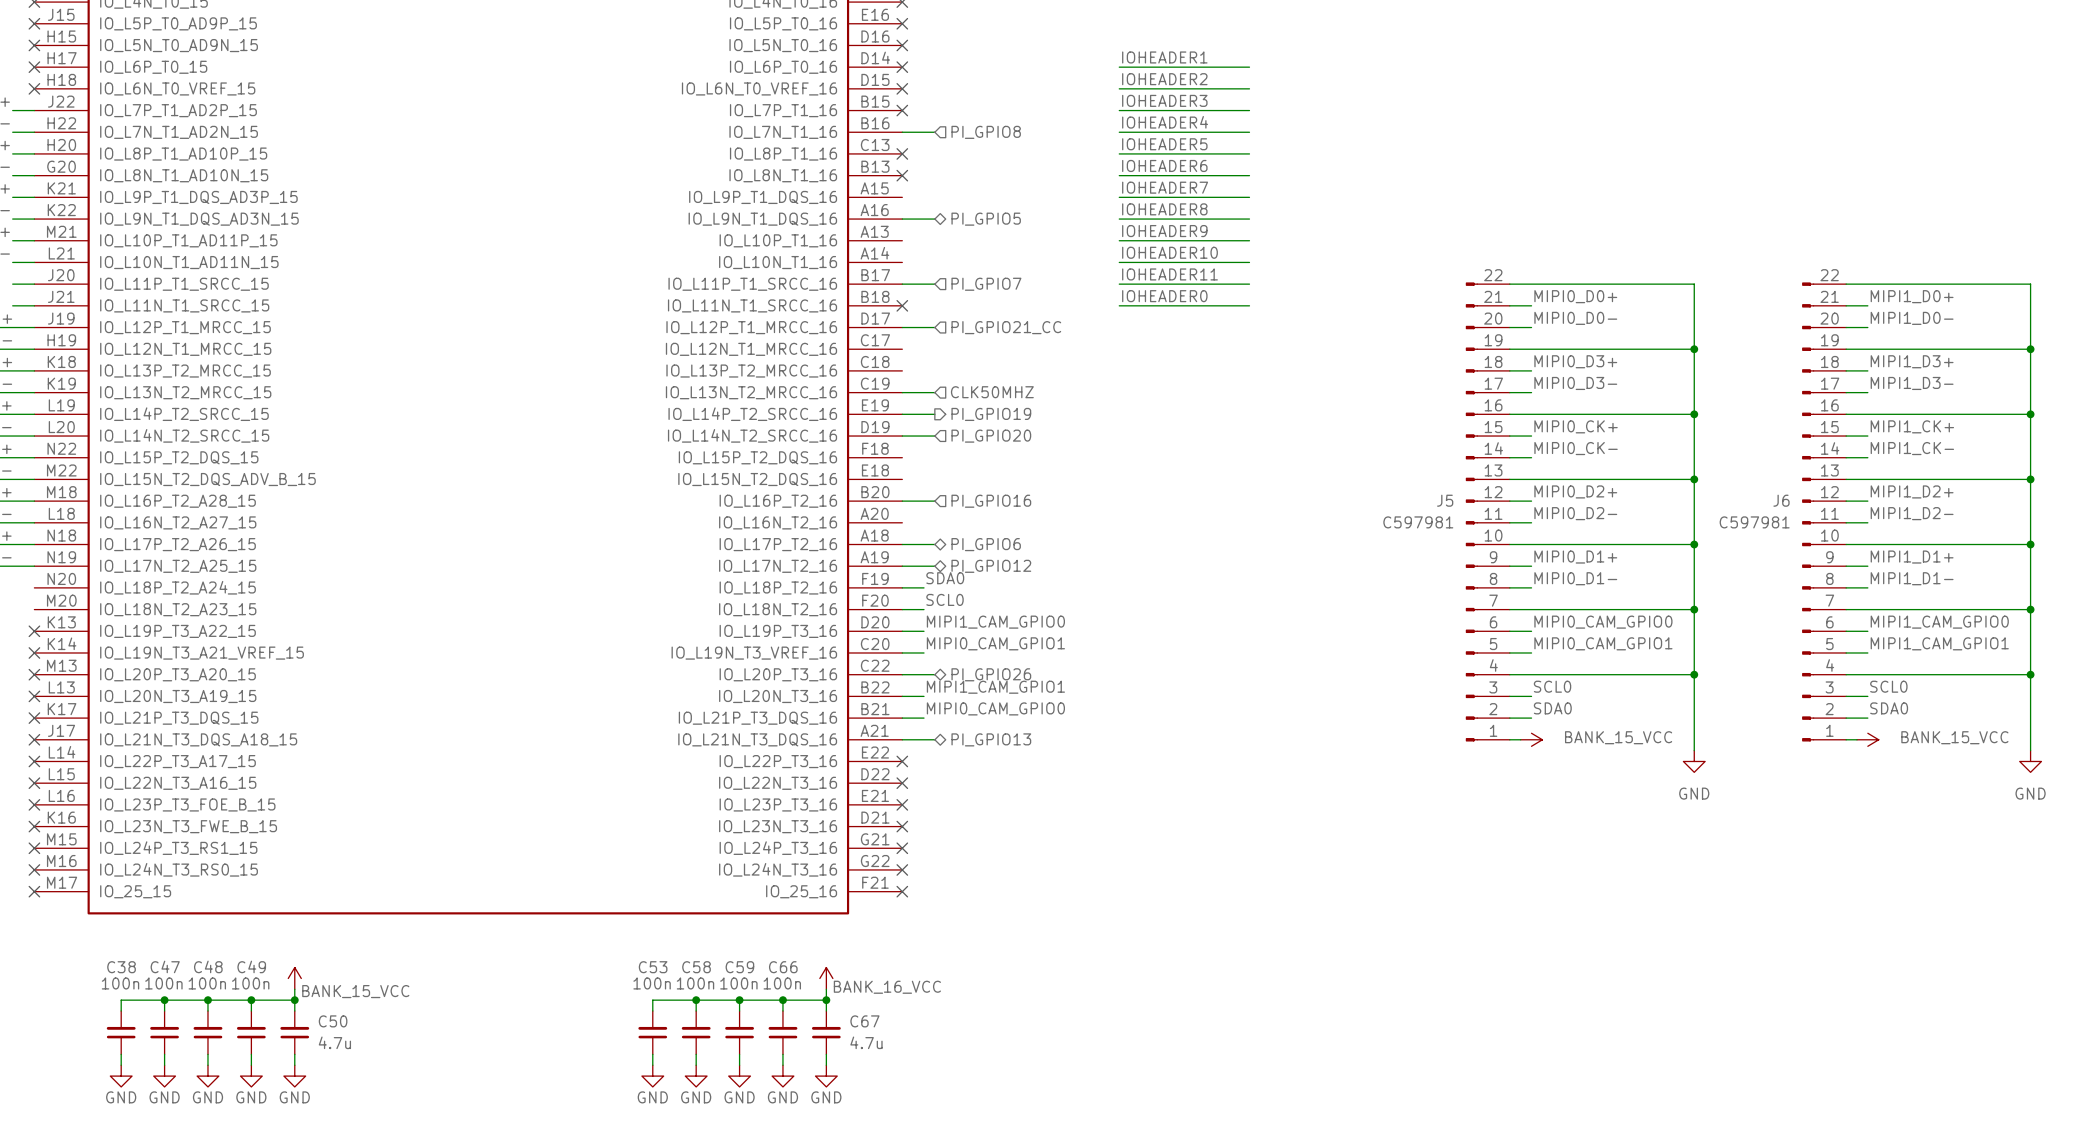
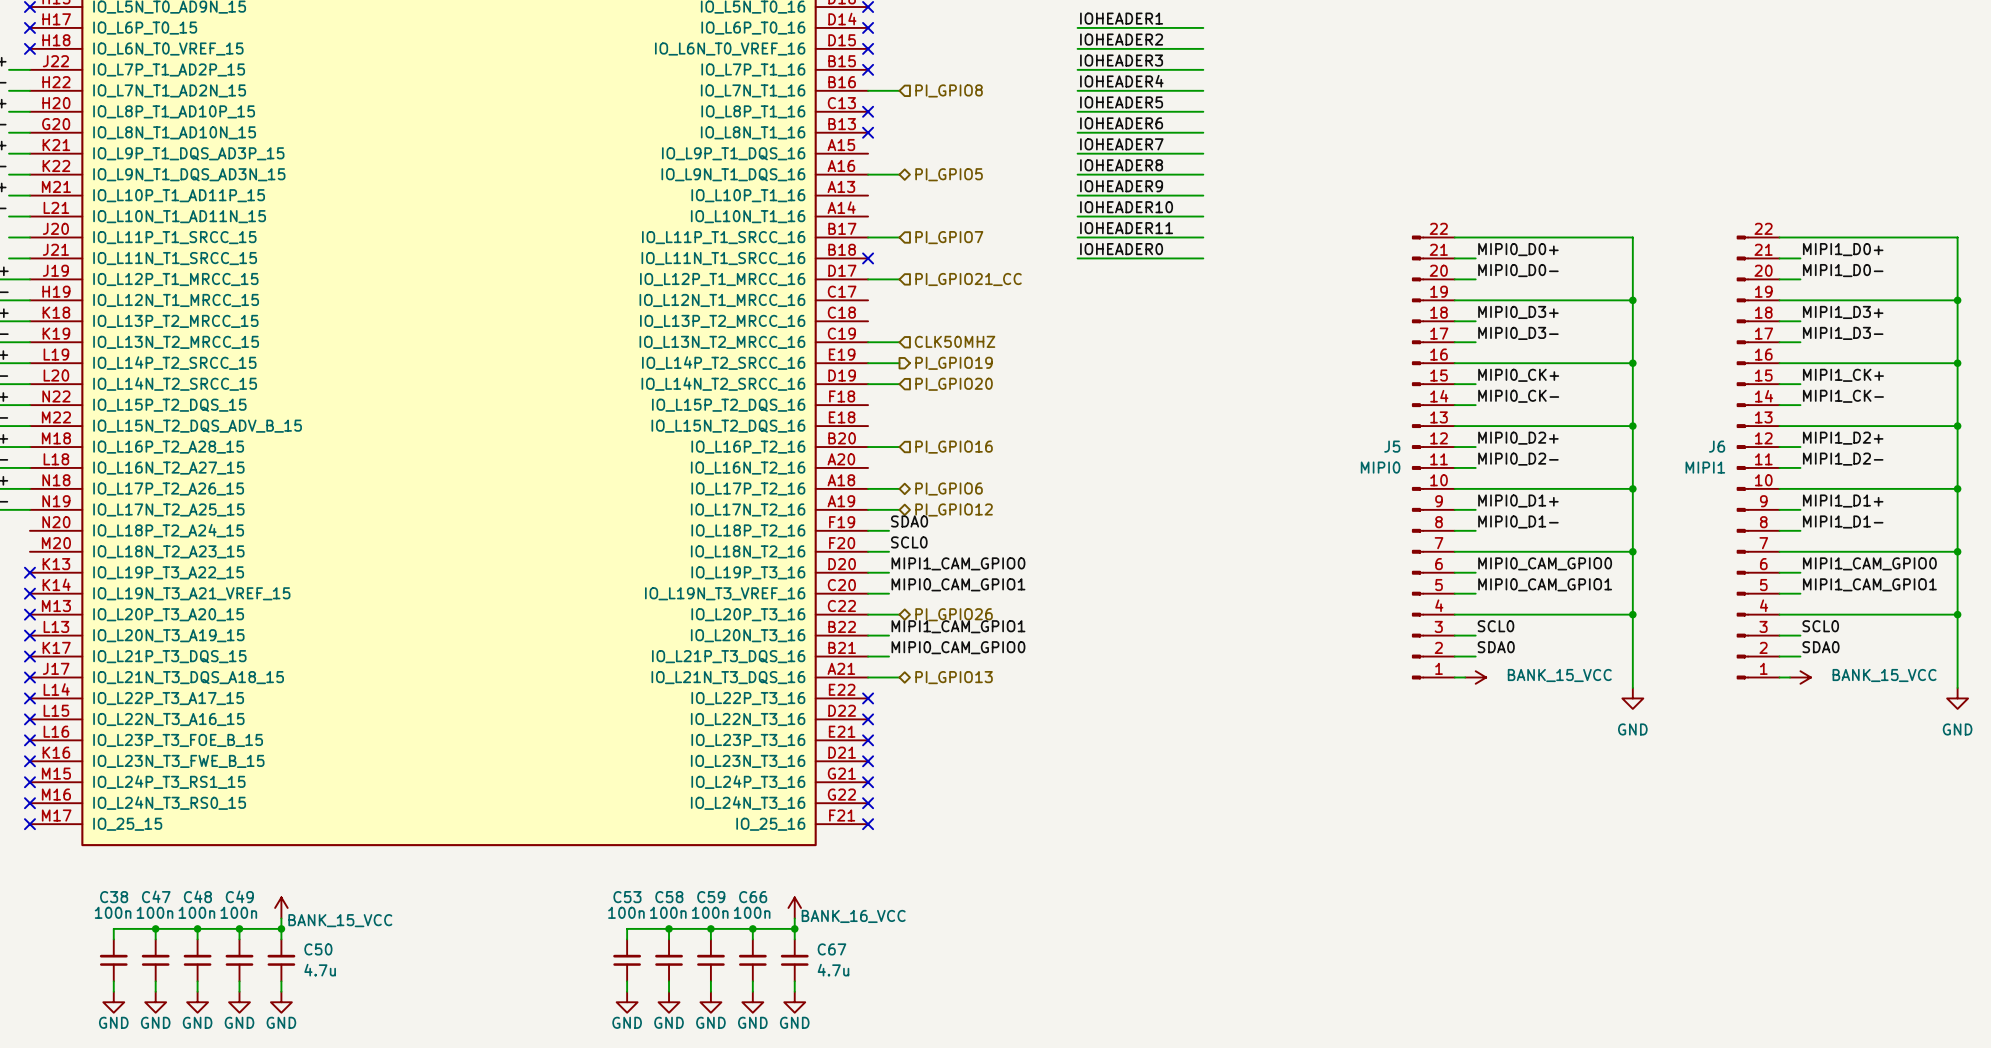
J5 value: C597981 (1418, 522) -> MIPI0 (1380, 467)
J6 value: C597981 (1754, 522) -> MIPI1 (1705, 467)

